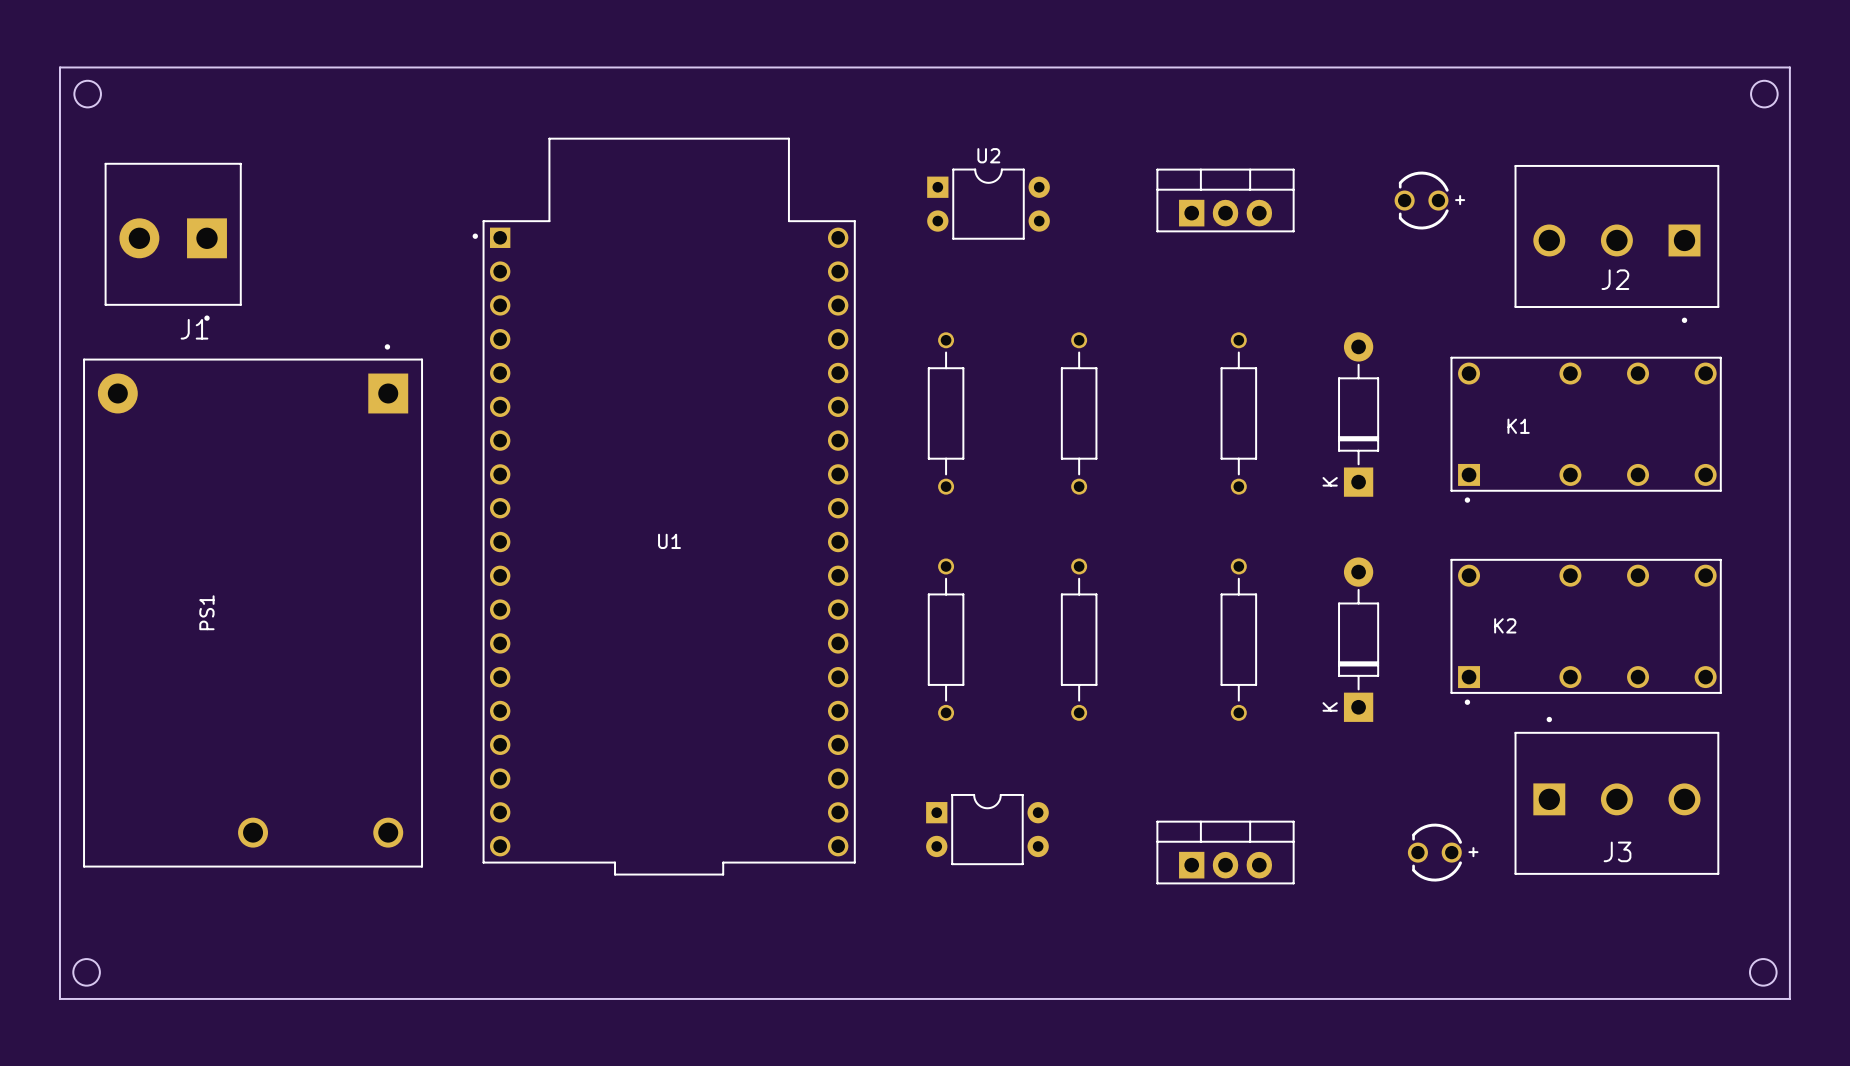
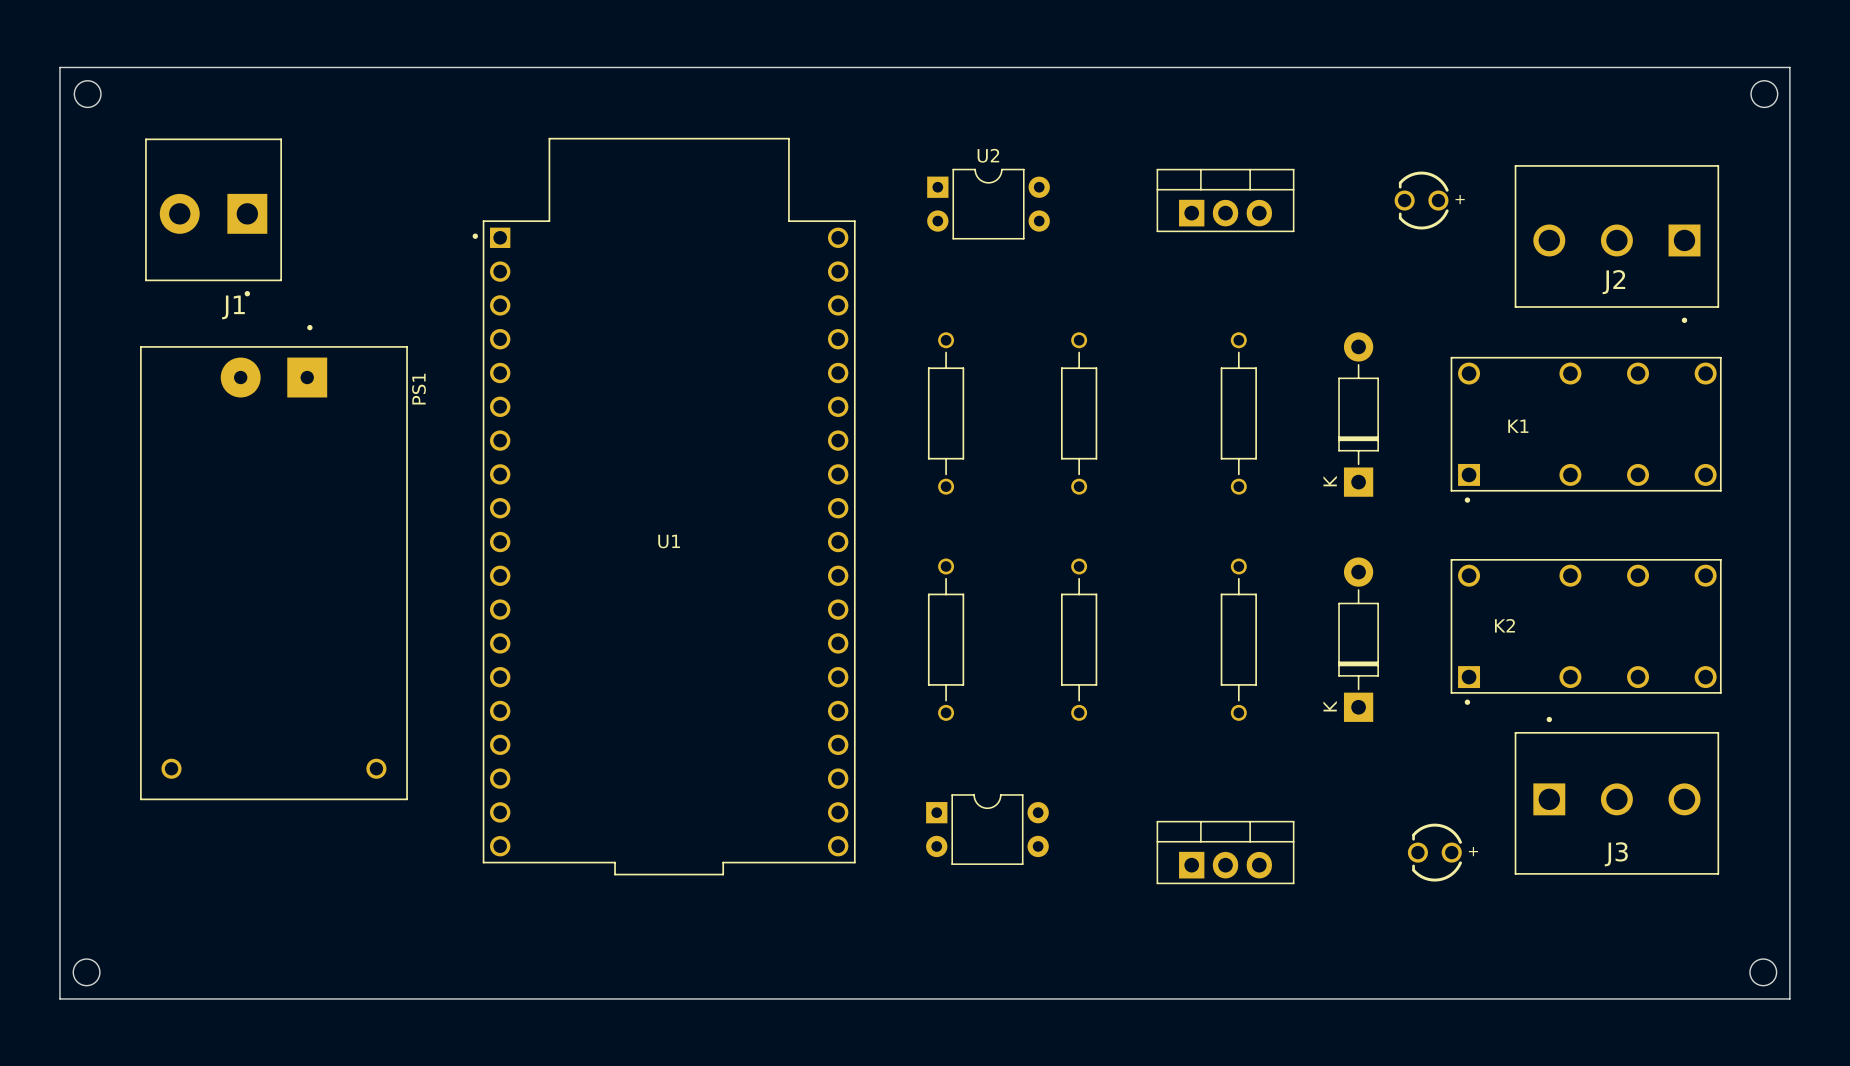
J1 position: (173, 241) -> (213, 217)
PS1 footprint: [83, 344, 423, 868] -> [140, 324, 408, 801]
PS1 name position: PS1 (206, 612) -> PS1 (418, 389)

